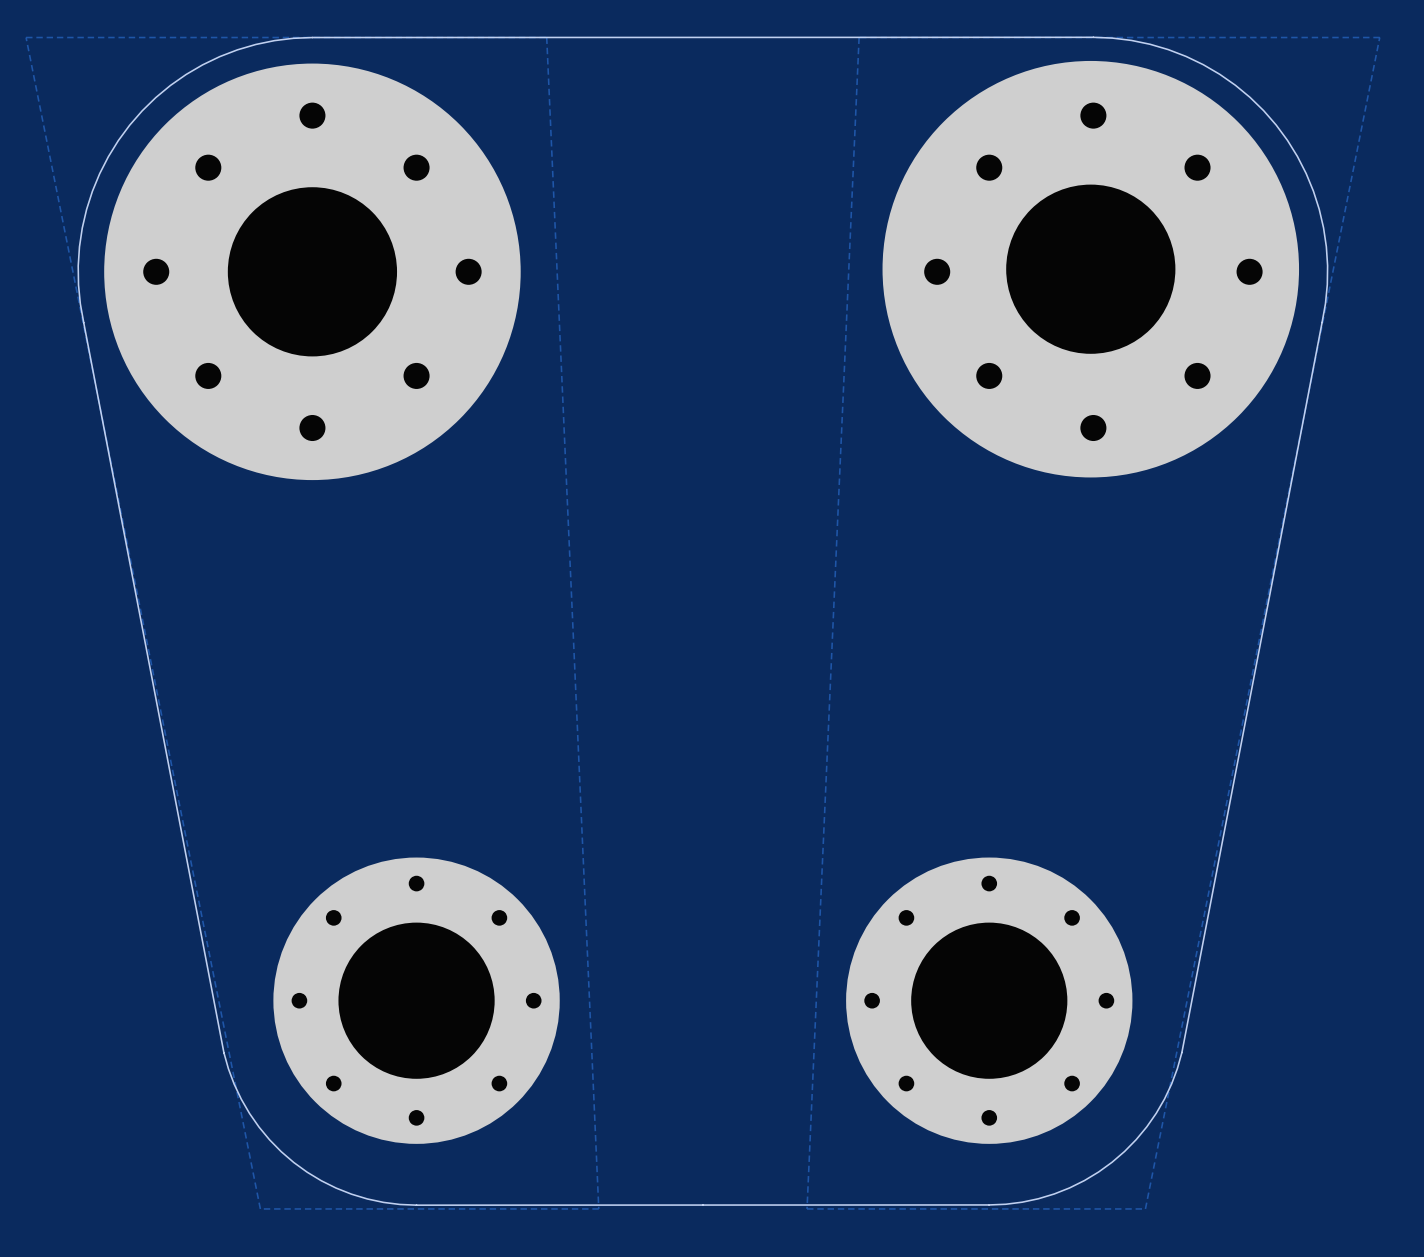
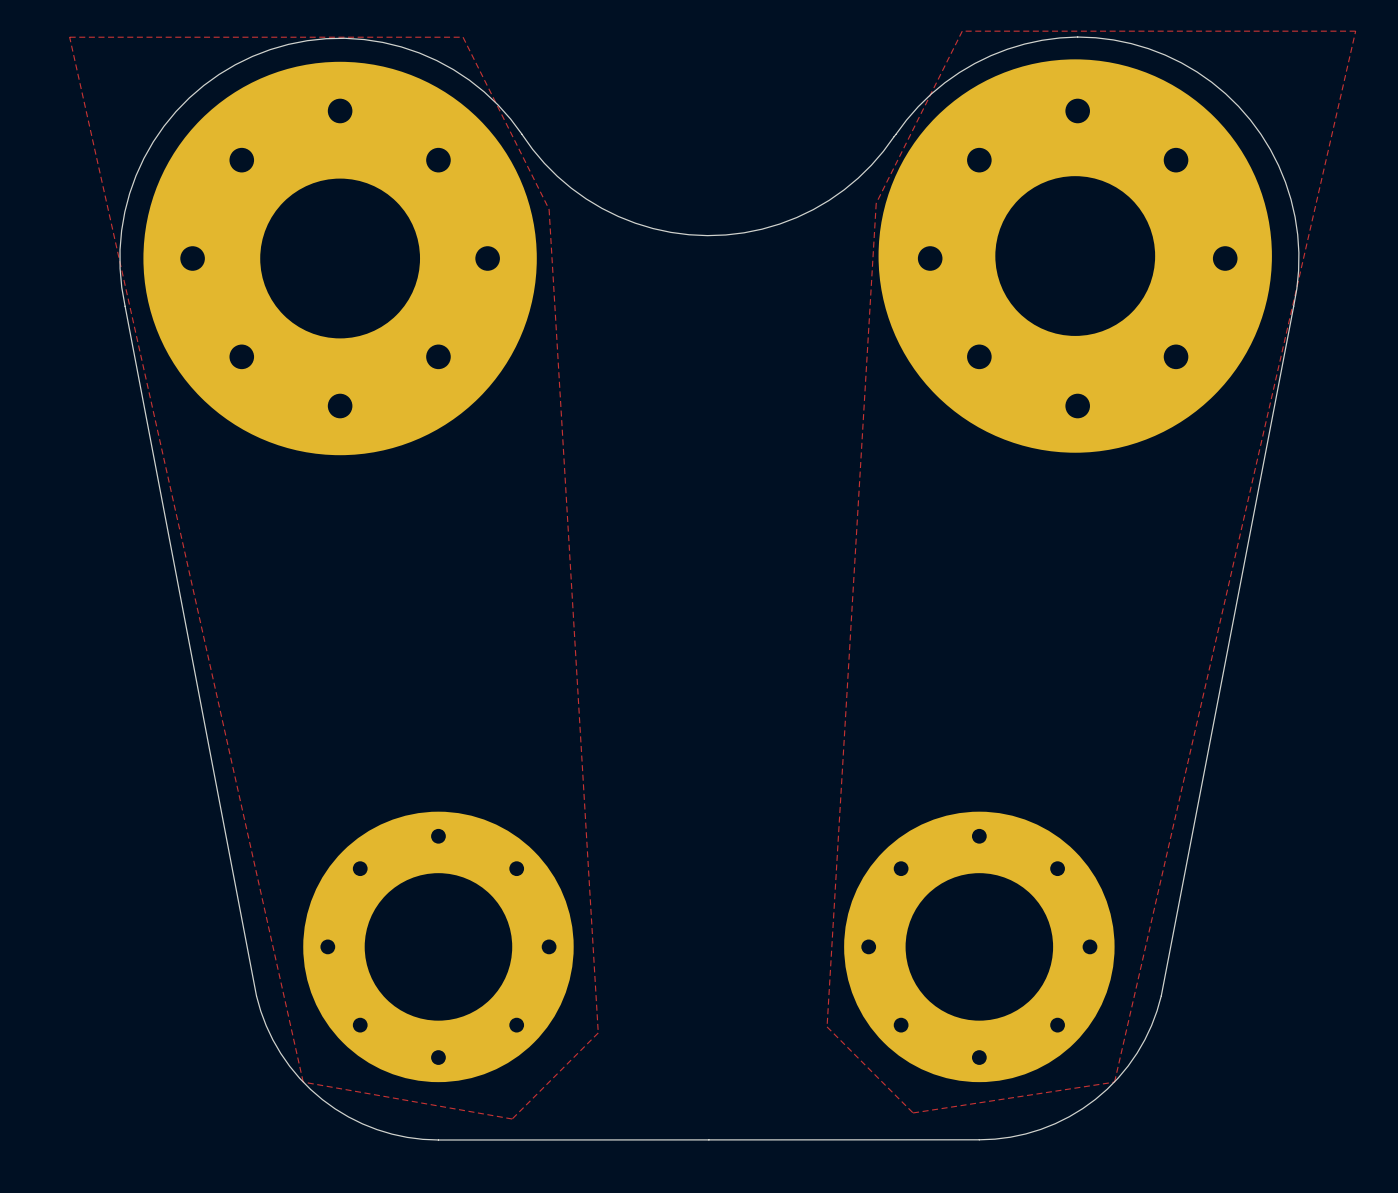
zone outline: (26, 37) (260, 1208) (598, 1208) (546, 37) (442, 37) -> (69, 37) (303, 1082) (512, 1119) (598, 1032) (549, 209) (463, 37)
zone outline: (859, 37) (1379, 37) (1145, 1208) (807, 1208) (859, 37) -> (962, 31) (876, 203) (827, 1026) (913, 1112) (1114, 1082) (1355, 31) (962, 31)
board edge: (1093, 37) (293, 38) (274, 40) (237, 49) (202, 64) (170, 85) (155, 97) (129, 125) (118, 140) (99, 173) (86, 209) (82, 228) (78, 265) (80, 303) (223, 1052) -> (1077, 37) (1024, 44) (974, 63) (931, 94) (906, 120) (871, 165) (858, 178) (829, 200) (796, 217) (779, 224) (744, 232) (725, 234) (689, 234) (653, 228) (635, 223) (601, 208) (586, 198) (557, 176) (532, 149) (498, 104) (469, 80) (436, 60) (401, 46) (382, 42) (364, 39) (326, 38) (307, 40) (270, 49) (252, 56) (219, 74) (189, 97) (176, 111) (164, 126) (143, 158) (129, 193) (121, 230) (120, 268) (121, 287) (256, 996)

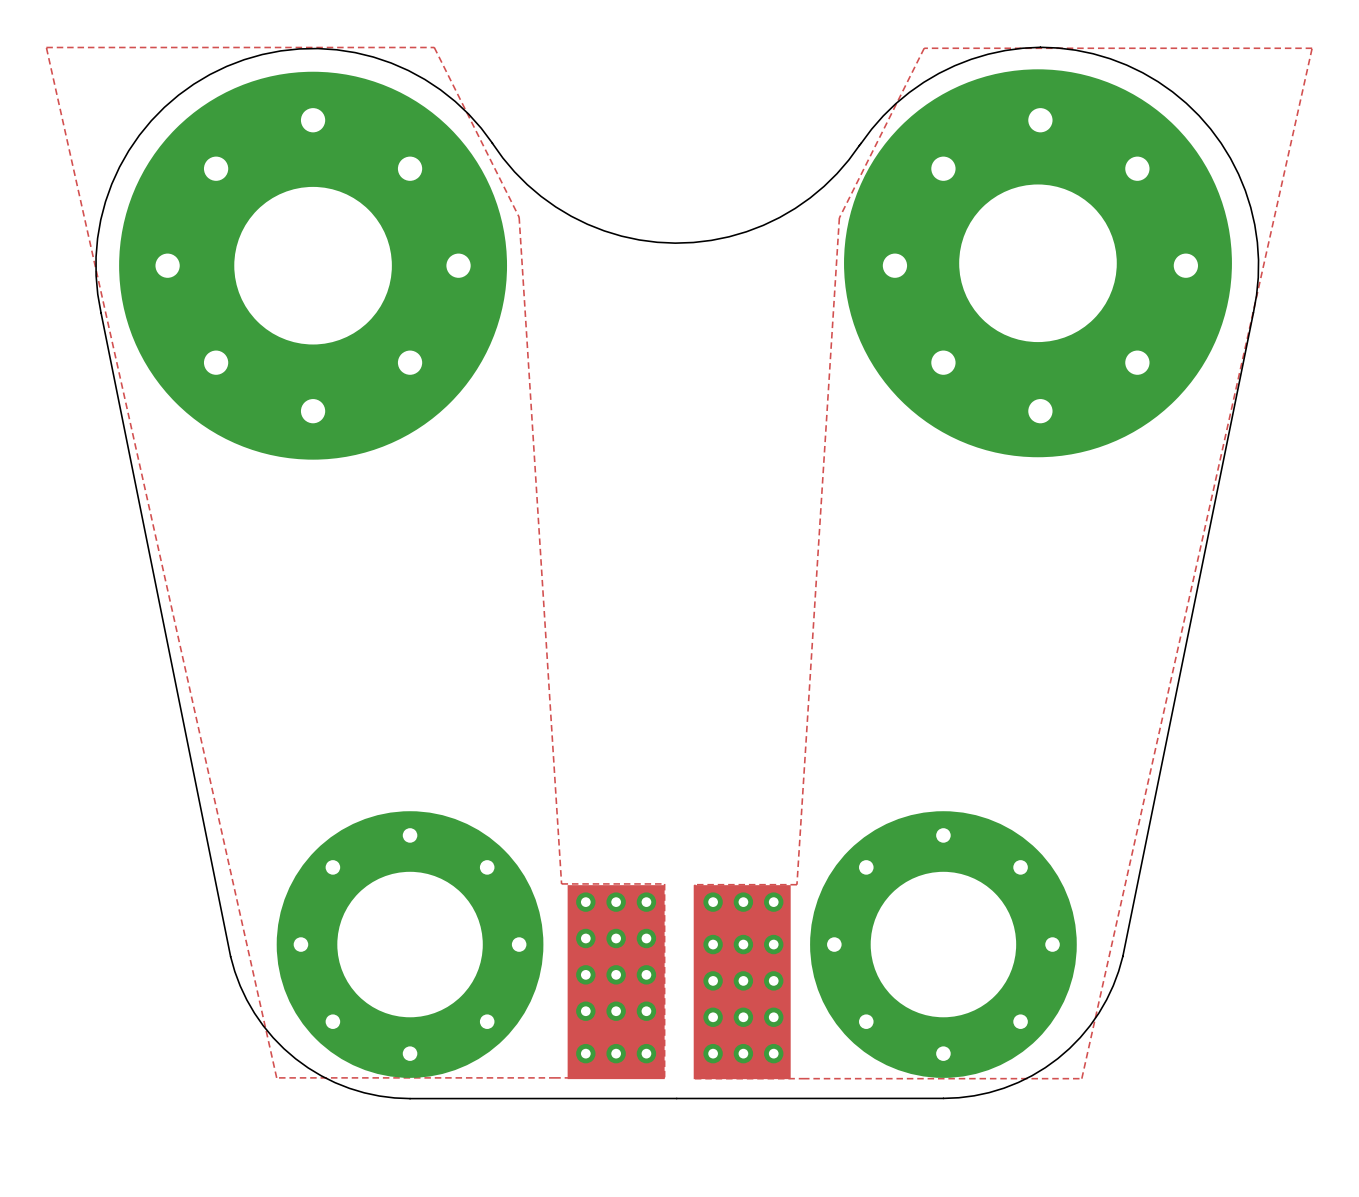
zone outline: (962, 31) (1355, 31) (1114, 1082) (913, 1112) (827, 1026) (876, 203) (962, 31) -> (924, 48) (839, 217) (796, 884) (694, 884) (694, 1078) (1081, 1078) (1312, 48) (924, 48)
zone outline: (549, 209) (598, 1032) (512, 1119) (303, 1082) -> (519, 217) (561, 883) (664, 883) (664, 1077) (276, 1077)
board edge: (125, 306) (256, 996) (266, 1025) (289, 1066) (310, 1089) (335, 1108) (377, 1129) (407, 1137) (438, 1140) (994, 1139) (1025, 1133) (1055, 1123) (1082, 1108) (1107, 1089) (1137, 1053) (1151, 1025) (1161, 995) (1293, 306) -> (101, 312) (230, 956) (240, 985) (263, 1025) (283, 1048) (308, 1067) (349, 1088) (379, 1096) (410, 1098) (958, 1097) (989, 1092) (1018, 1082) (1045, 1067) (1069, 1048) (1098, 1013) (1113, 985) (1122, 956) (1253, 312)
via: none -> (585, 902)
via: none -> (616, 902)
via: none -> (646, 902)
via: none -> (713, 902)
via: none -> (743, 902)
via: none -> (773, 902)
via: none -> (585, 938)
via: none -> (616, 938)
via: none -> (646, 938)
via: none -> (713, 944)
via: none -> (743, 944)
via: none -> (773, 944)
via: none -> (585, 974)
via: none -> (616, 974)
via: none -> (646, 974)
via: none -> (713, 980)
via: none -> (743, 980)
via: none -> (773, 980)
part: none -> (616, 982)
part: none -> (742, 982)
via: none -> (585, 1011)
via: none -> (616, 1011)
via: none -> (646, 1011)
via: none -> (713, 1017)
via: none -> (743, 1017)
via: none -> (773, 1017)
via: none -> (585, 1053)
via: none -> (616, 1053)
via: none -> (646, 1053)
via: none -> (713, 1053)
via: none -> (743, 1053)
via: none -> (773, 1053)

